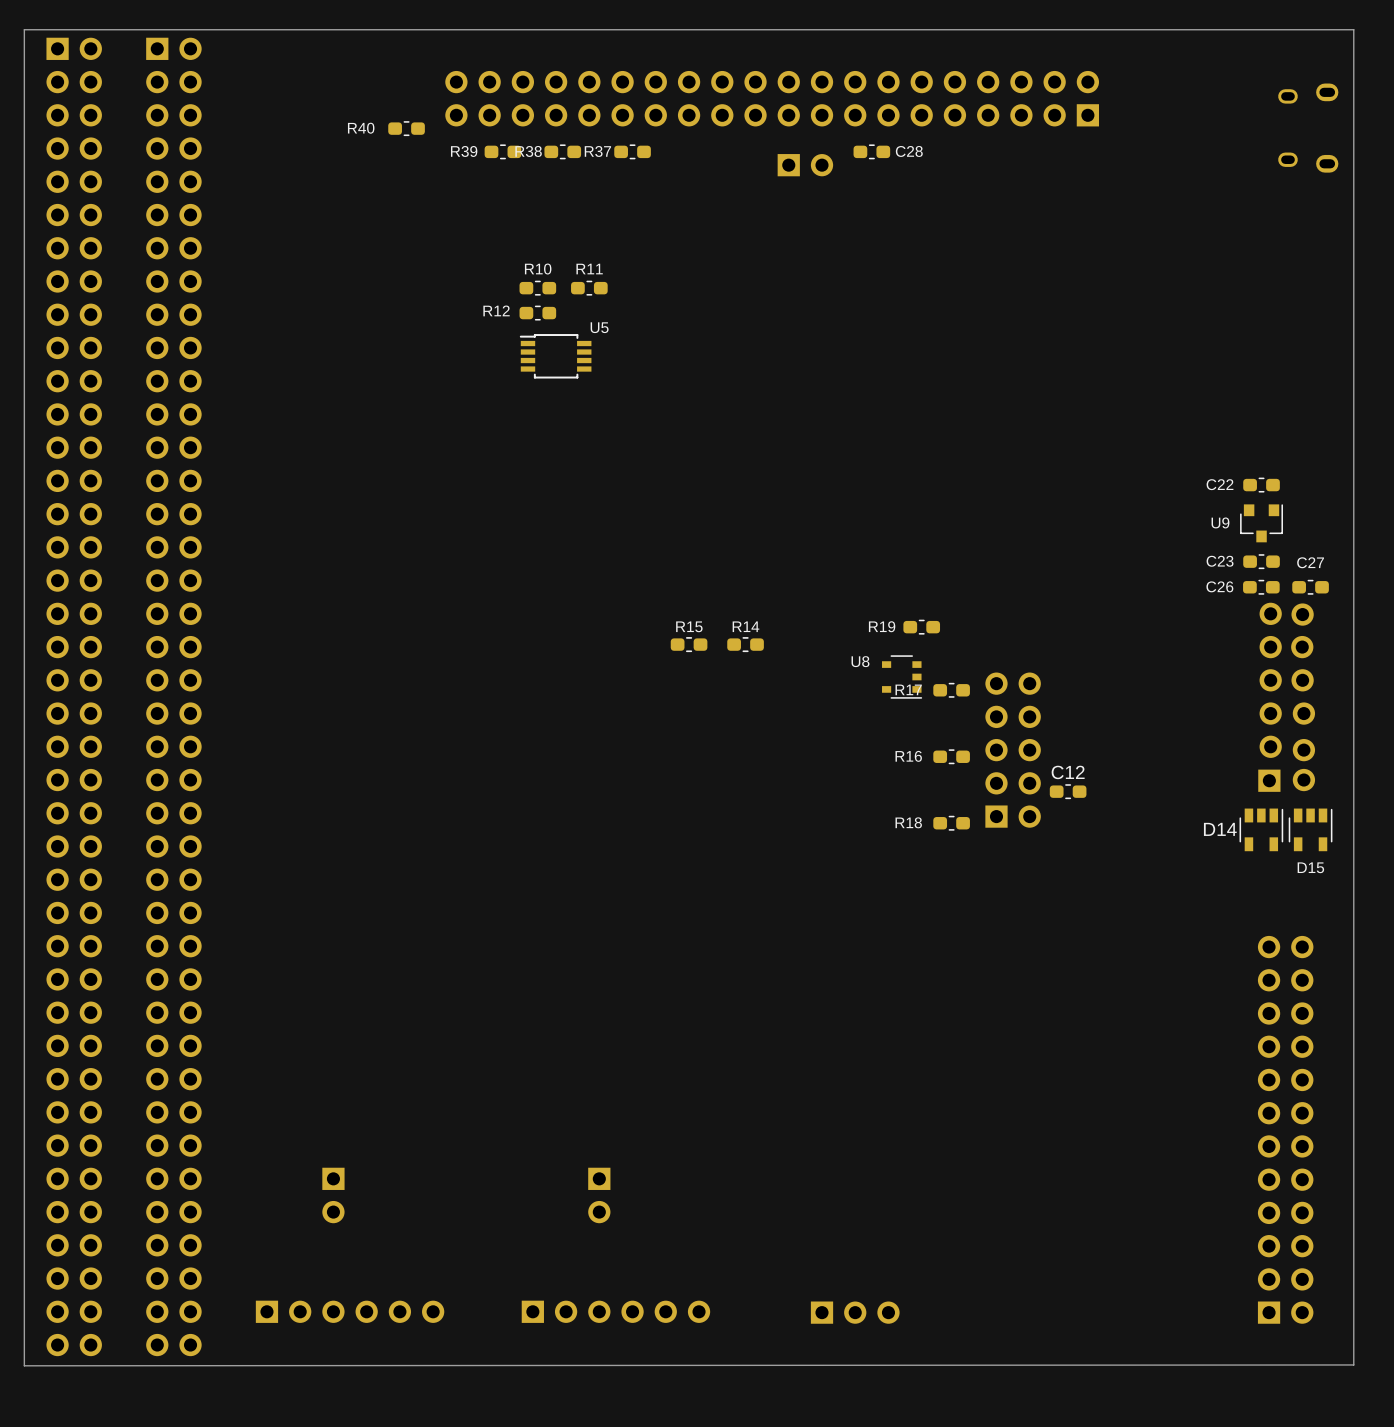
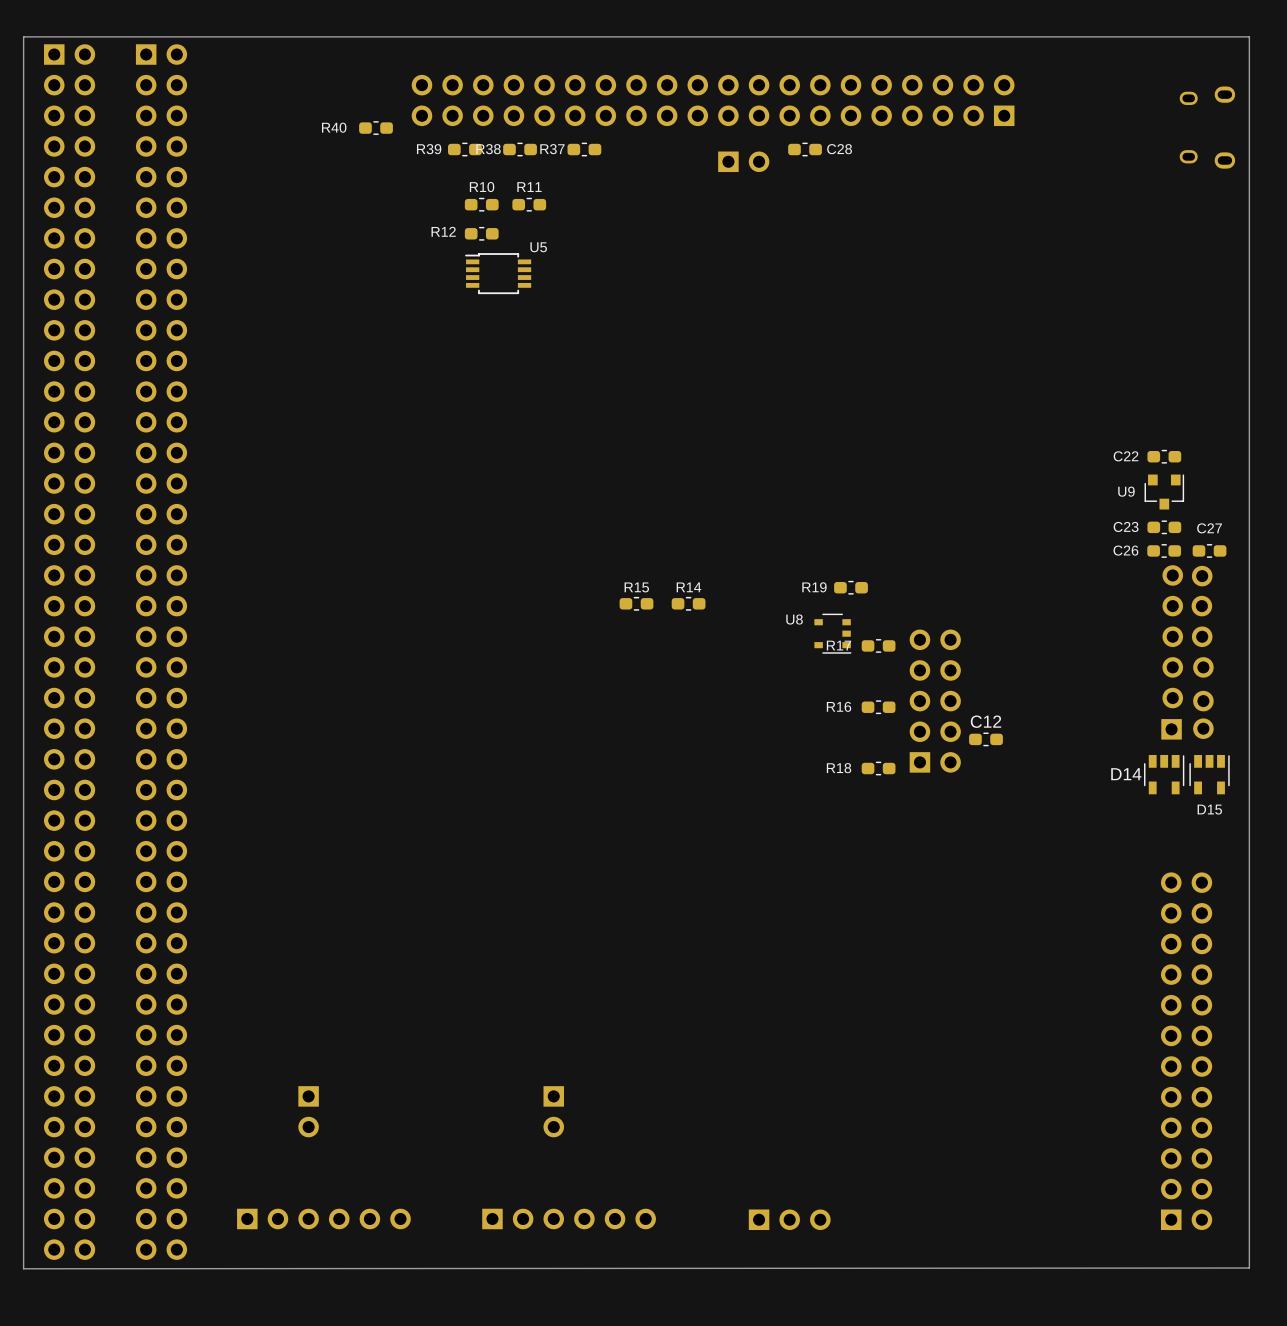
R10 position: (537, 288) -> (481, 204)
R11 position: (589, 288) -> (529, 204)
R12 position: (537, 313) -> (481, 233)
U5 position: (555, 356) -> (498, 273)

